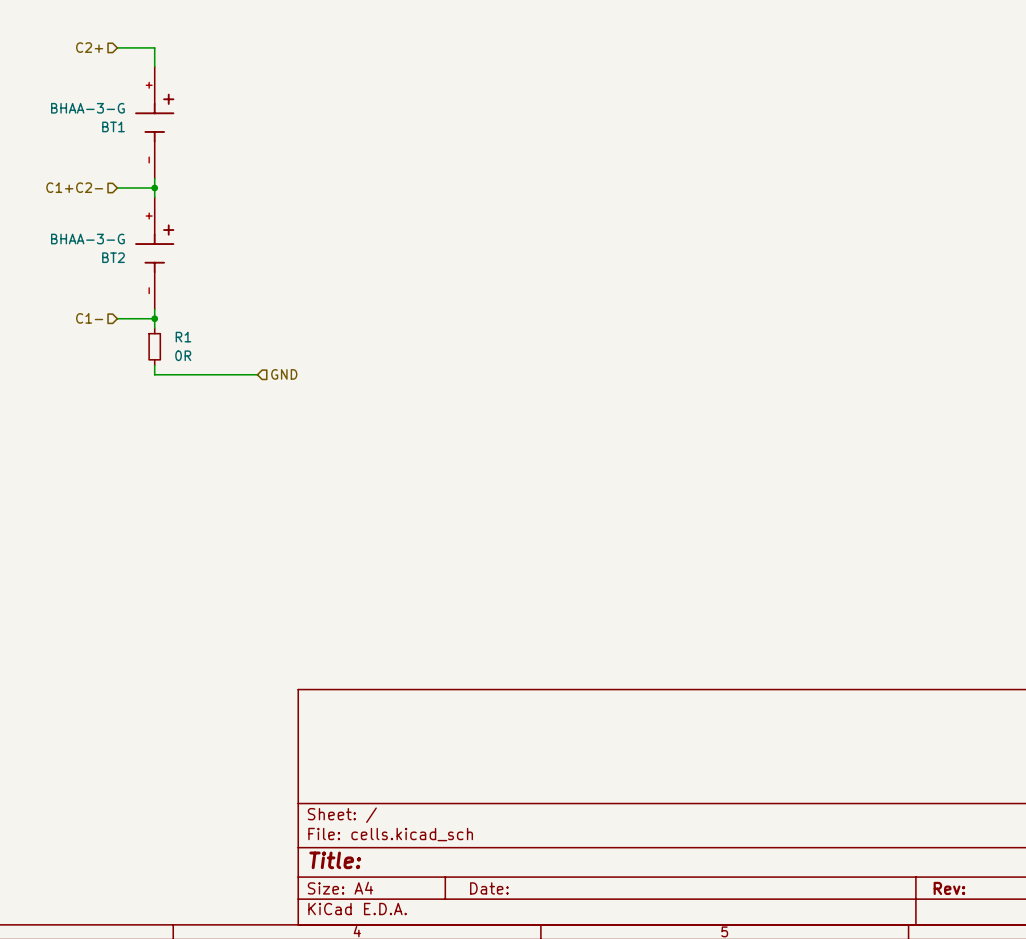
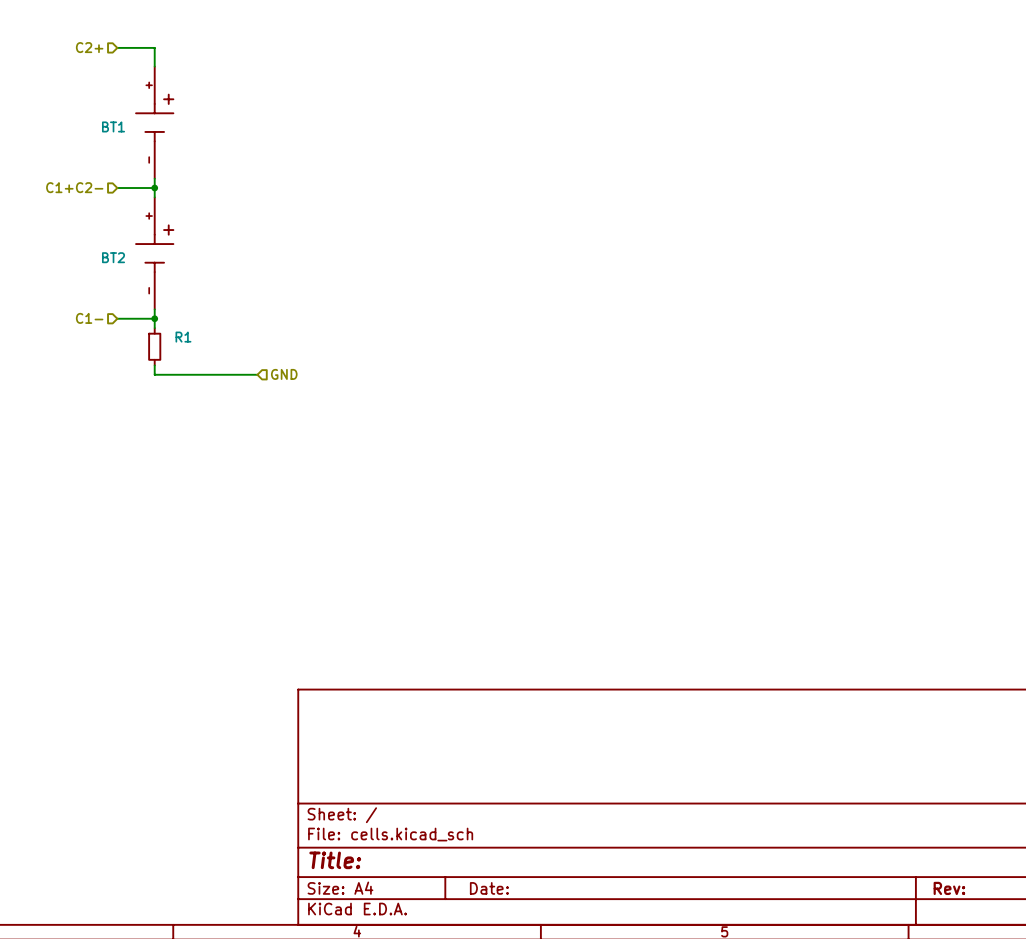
BT1 value: BHAA-3-G (87, 108) -> none
BT2 value: BHAA-3-G (87, 239) -> none
R1 value: 0R (183, 355) -> none

